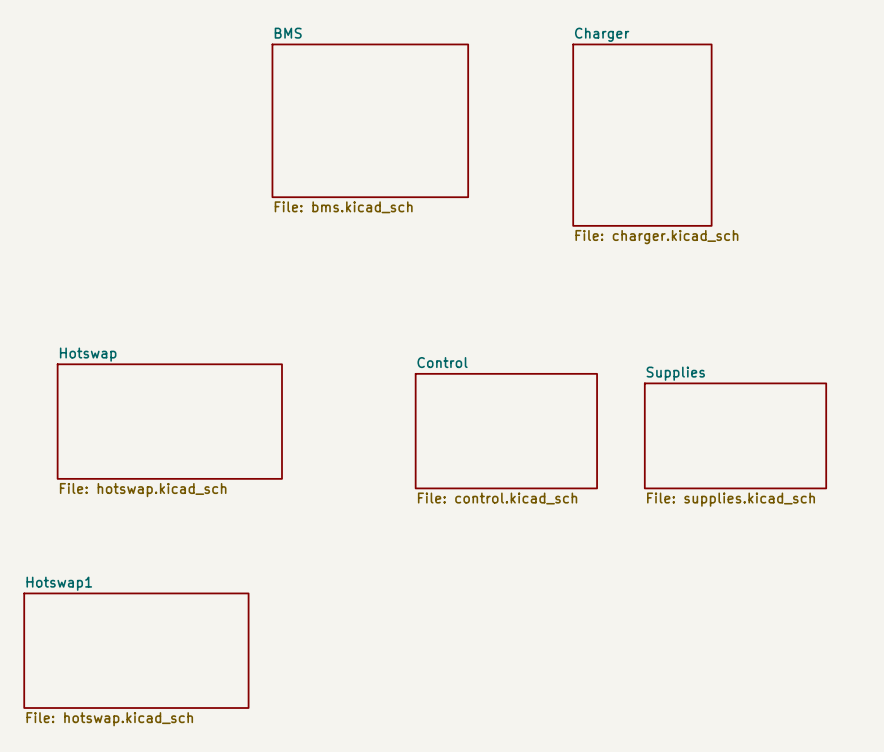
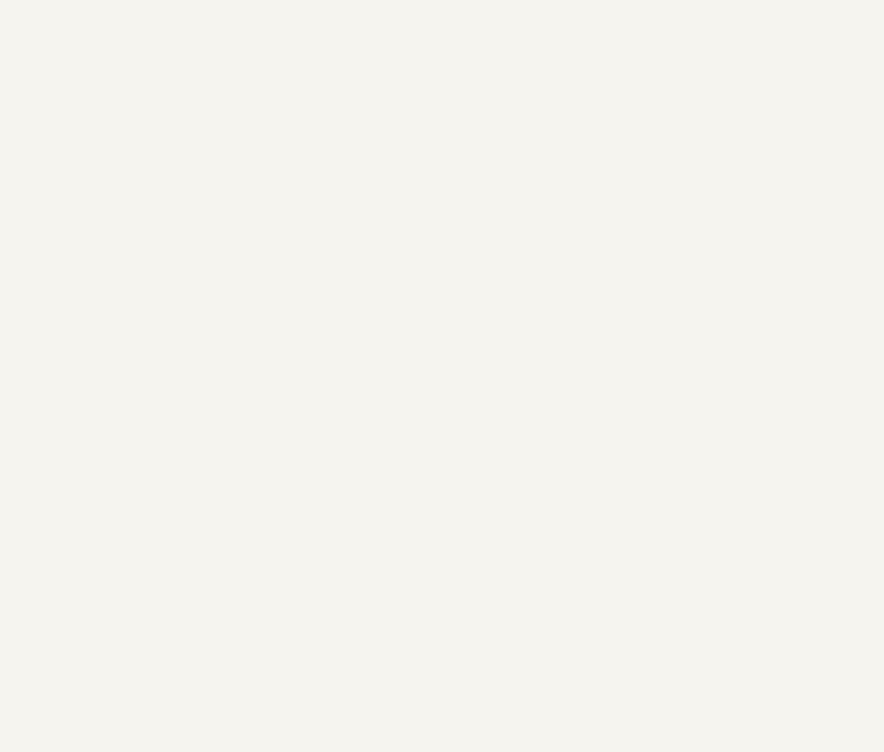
sheet BMS: File: bms.kicad_sch (370, 120) -> none
sheet Charger: File: charger.kicad_sch (642, 135) -> none
sheet Hotswap: File: hotswap.kicad_sch (169, 421) -> none
sheet Control: File: control.kicad_sch (506, 431) -> none
sheet Supplies: File: supplies.kicad_sch (735, 435) -> none
sheet Hotswap1: File: hotswap.kicad_sch (136, 650) -> none

